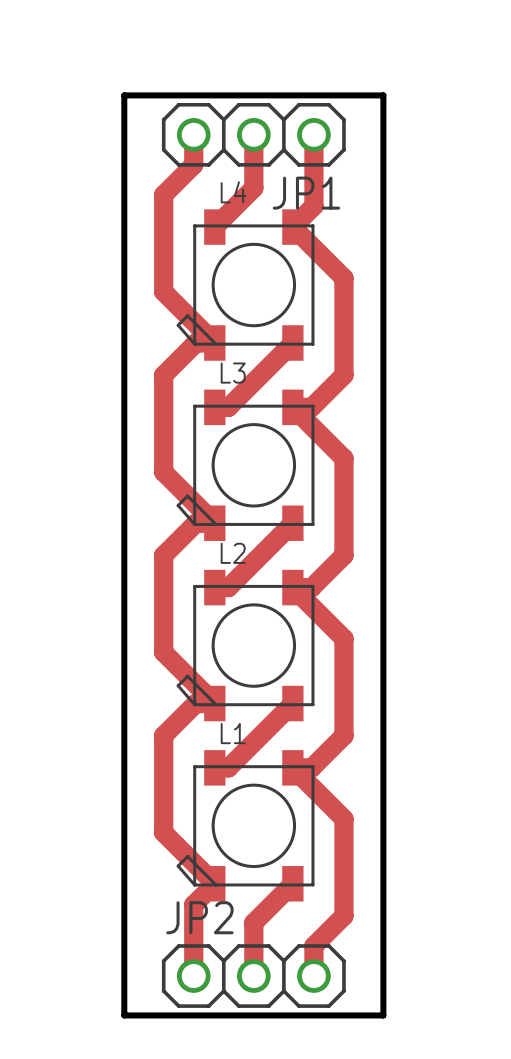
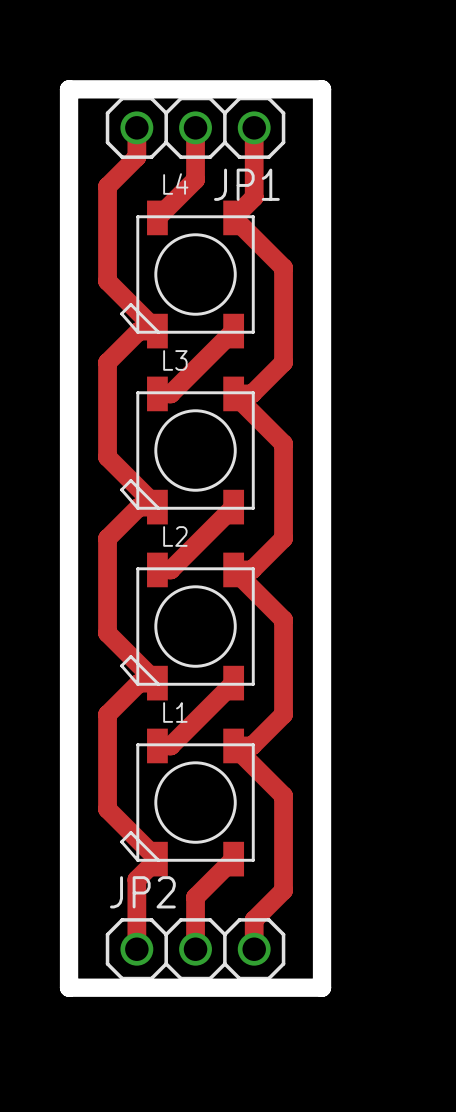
board edge width: thin (124, 95) (383, 95) (383, 1015) (124, 1015) (124, 95) -> thick (69, 89) (322, 89) (322, 987) (69, 987) (69, 89)

